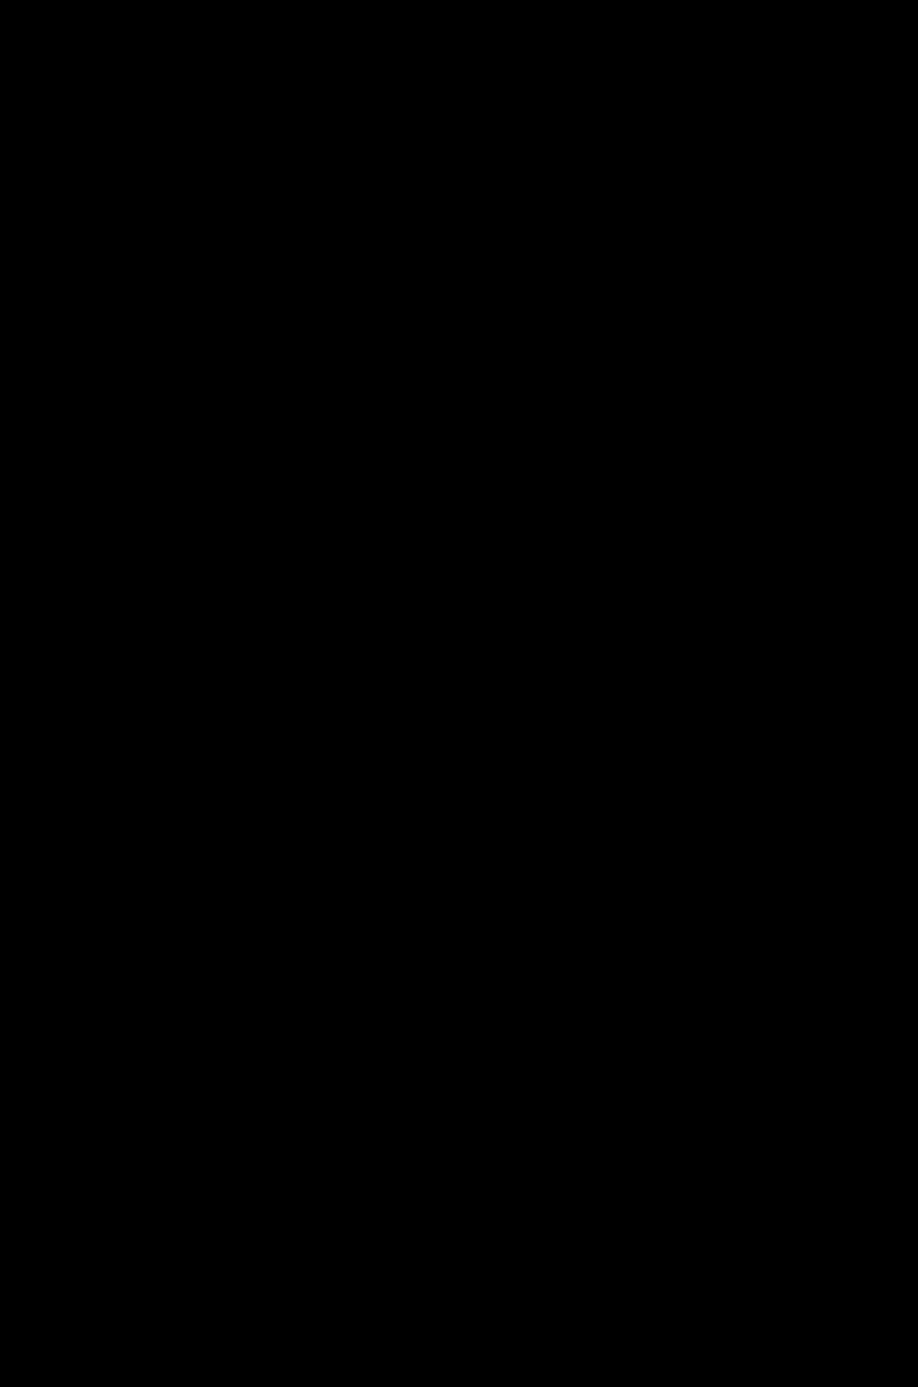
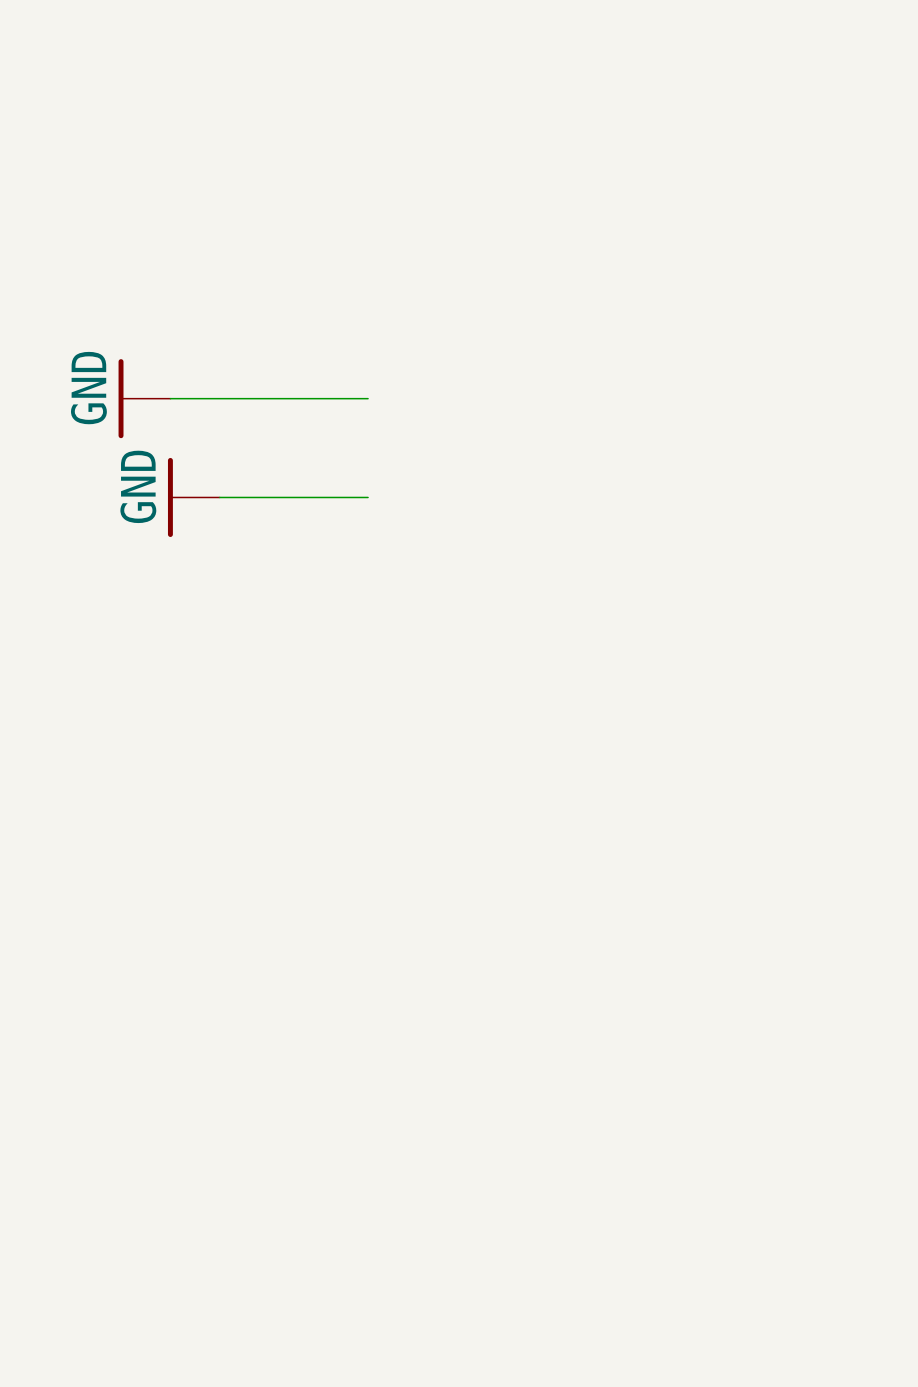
power symbol: none -> GND (144, 398)
wire: none -> (170, 398) (368, 398)
power symbol: none -> GND (193, 497)
wire: none -> (219, 497) (368, 497)

